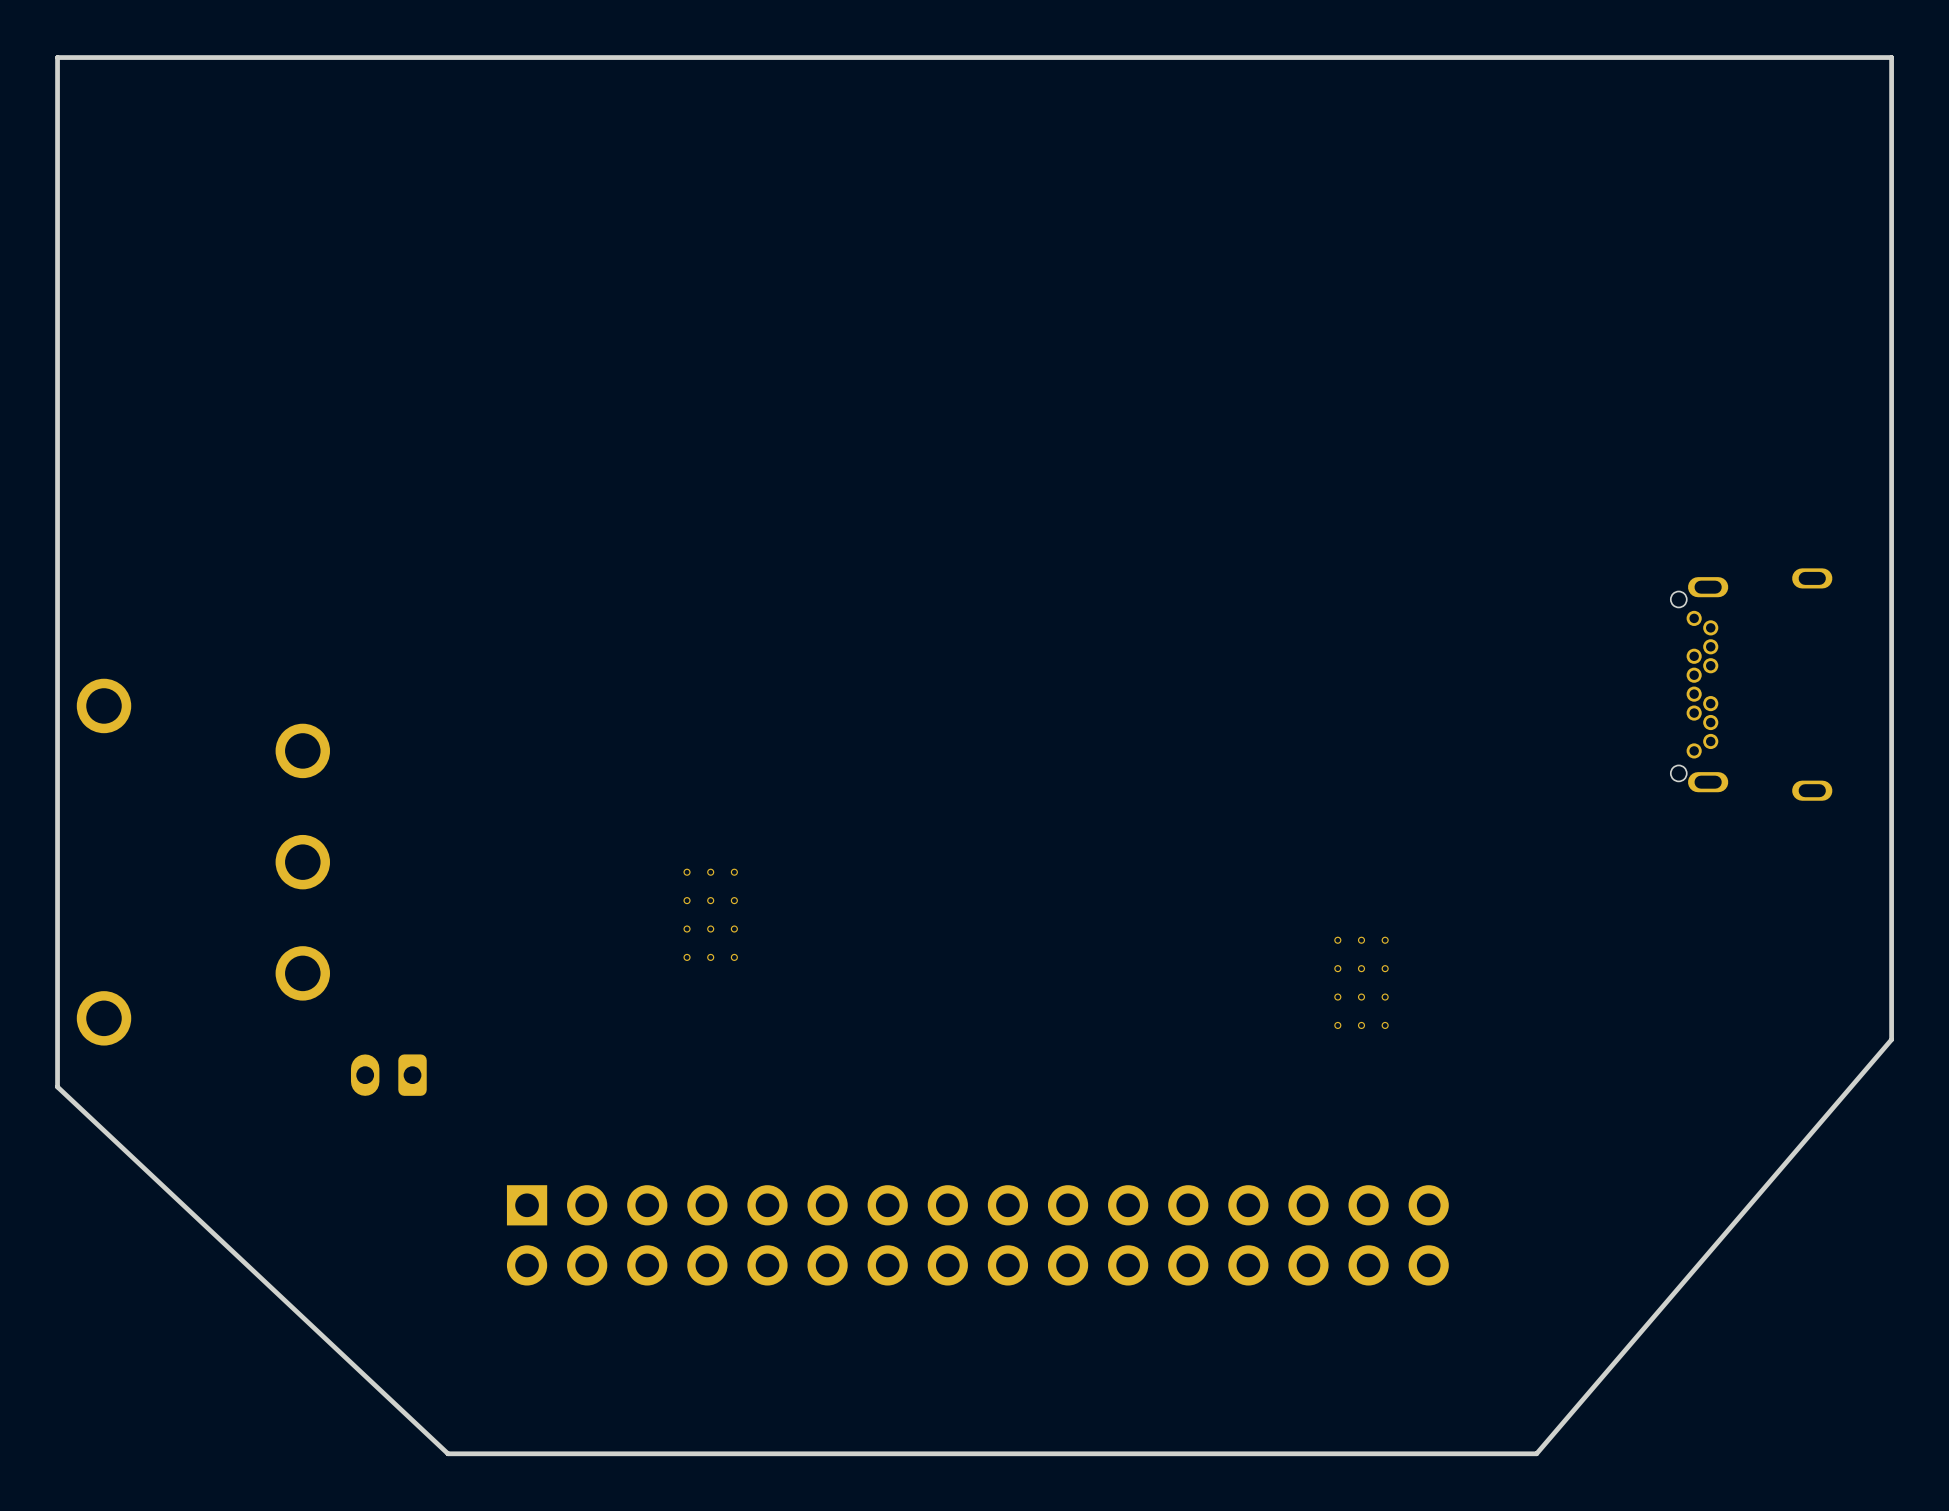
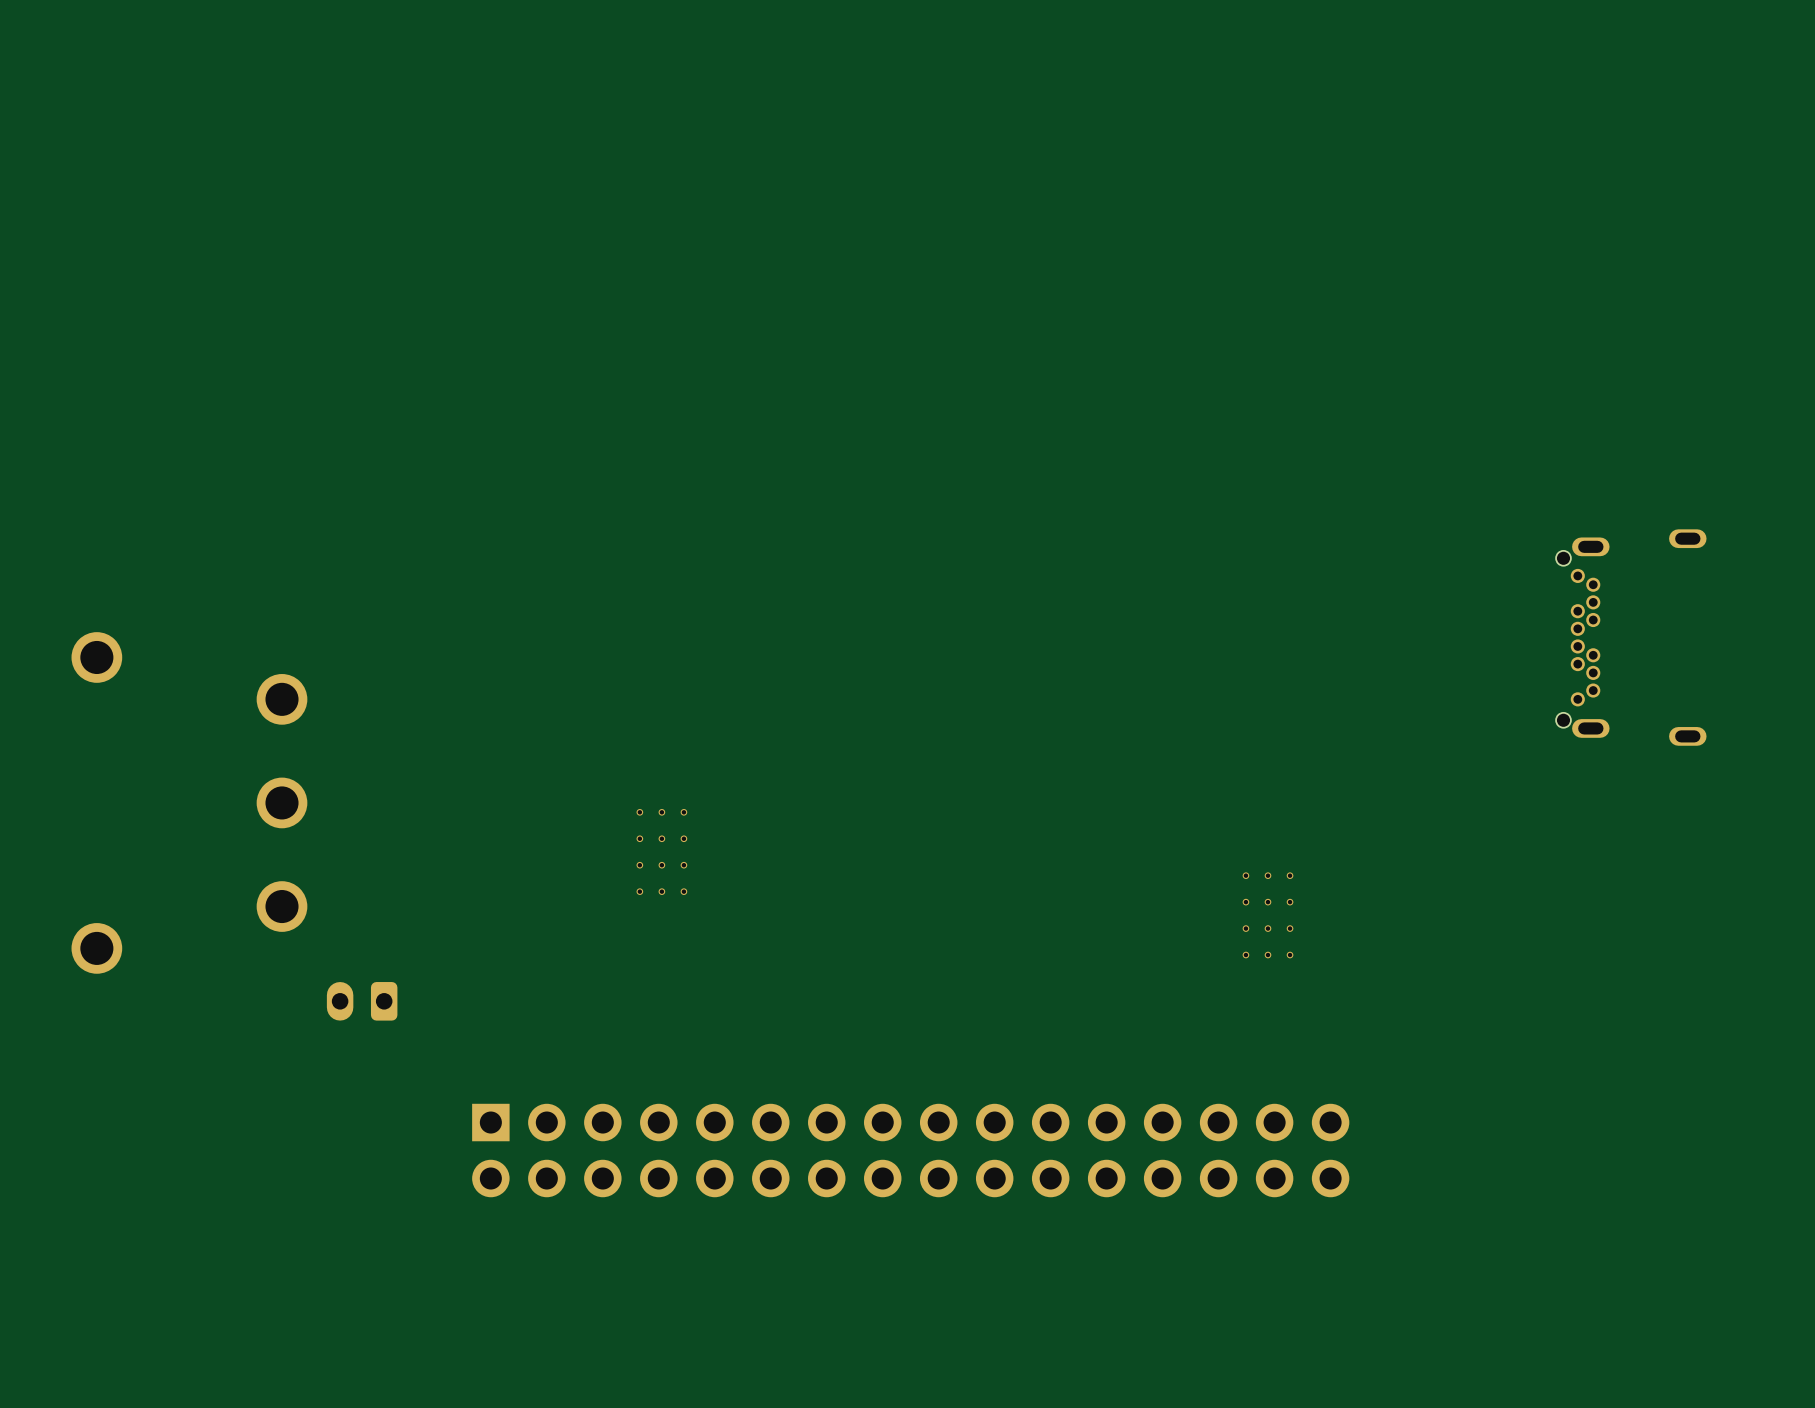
board edge: (1891, 57) (57, 57) (57, 1086) (448, 1453) (1536, 1453) (1891, 1039) (1891, 57) -> none

